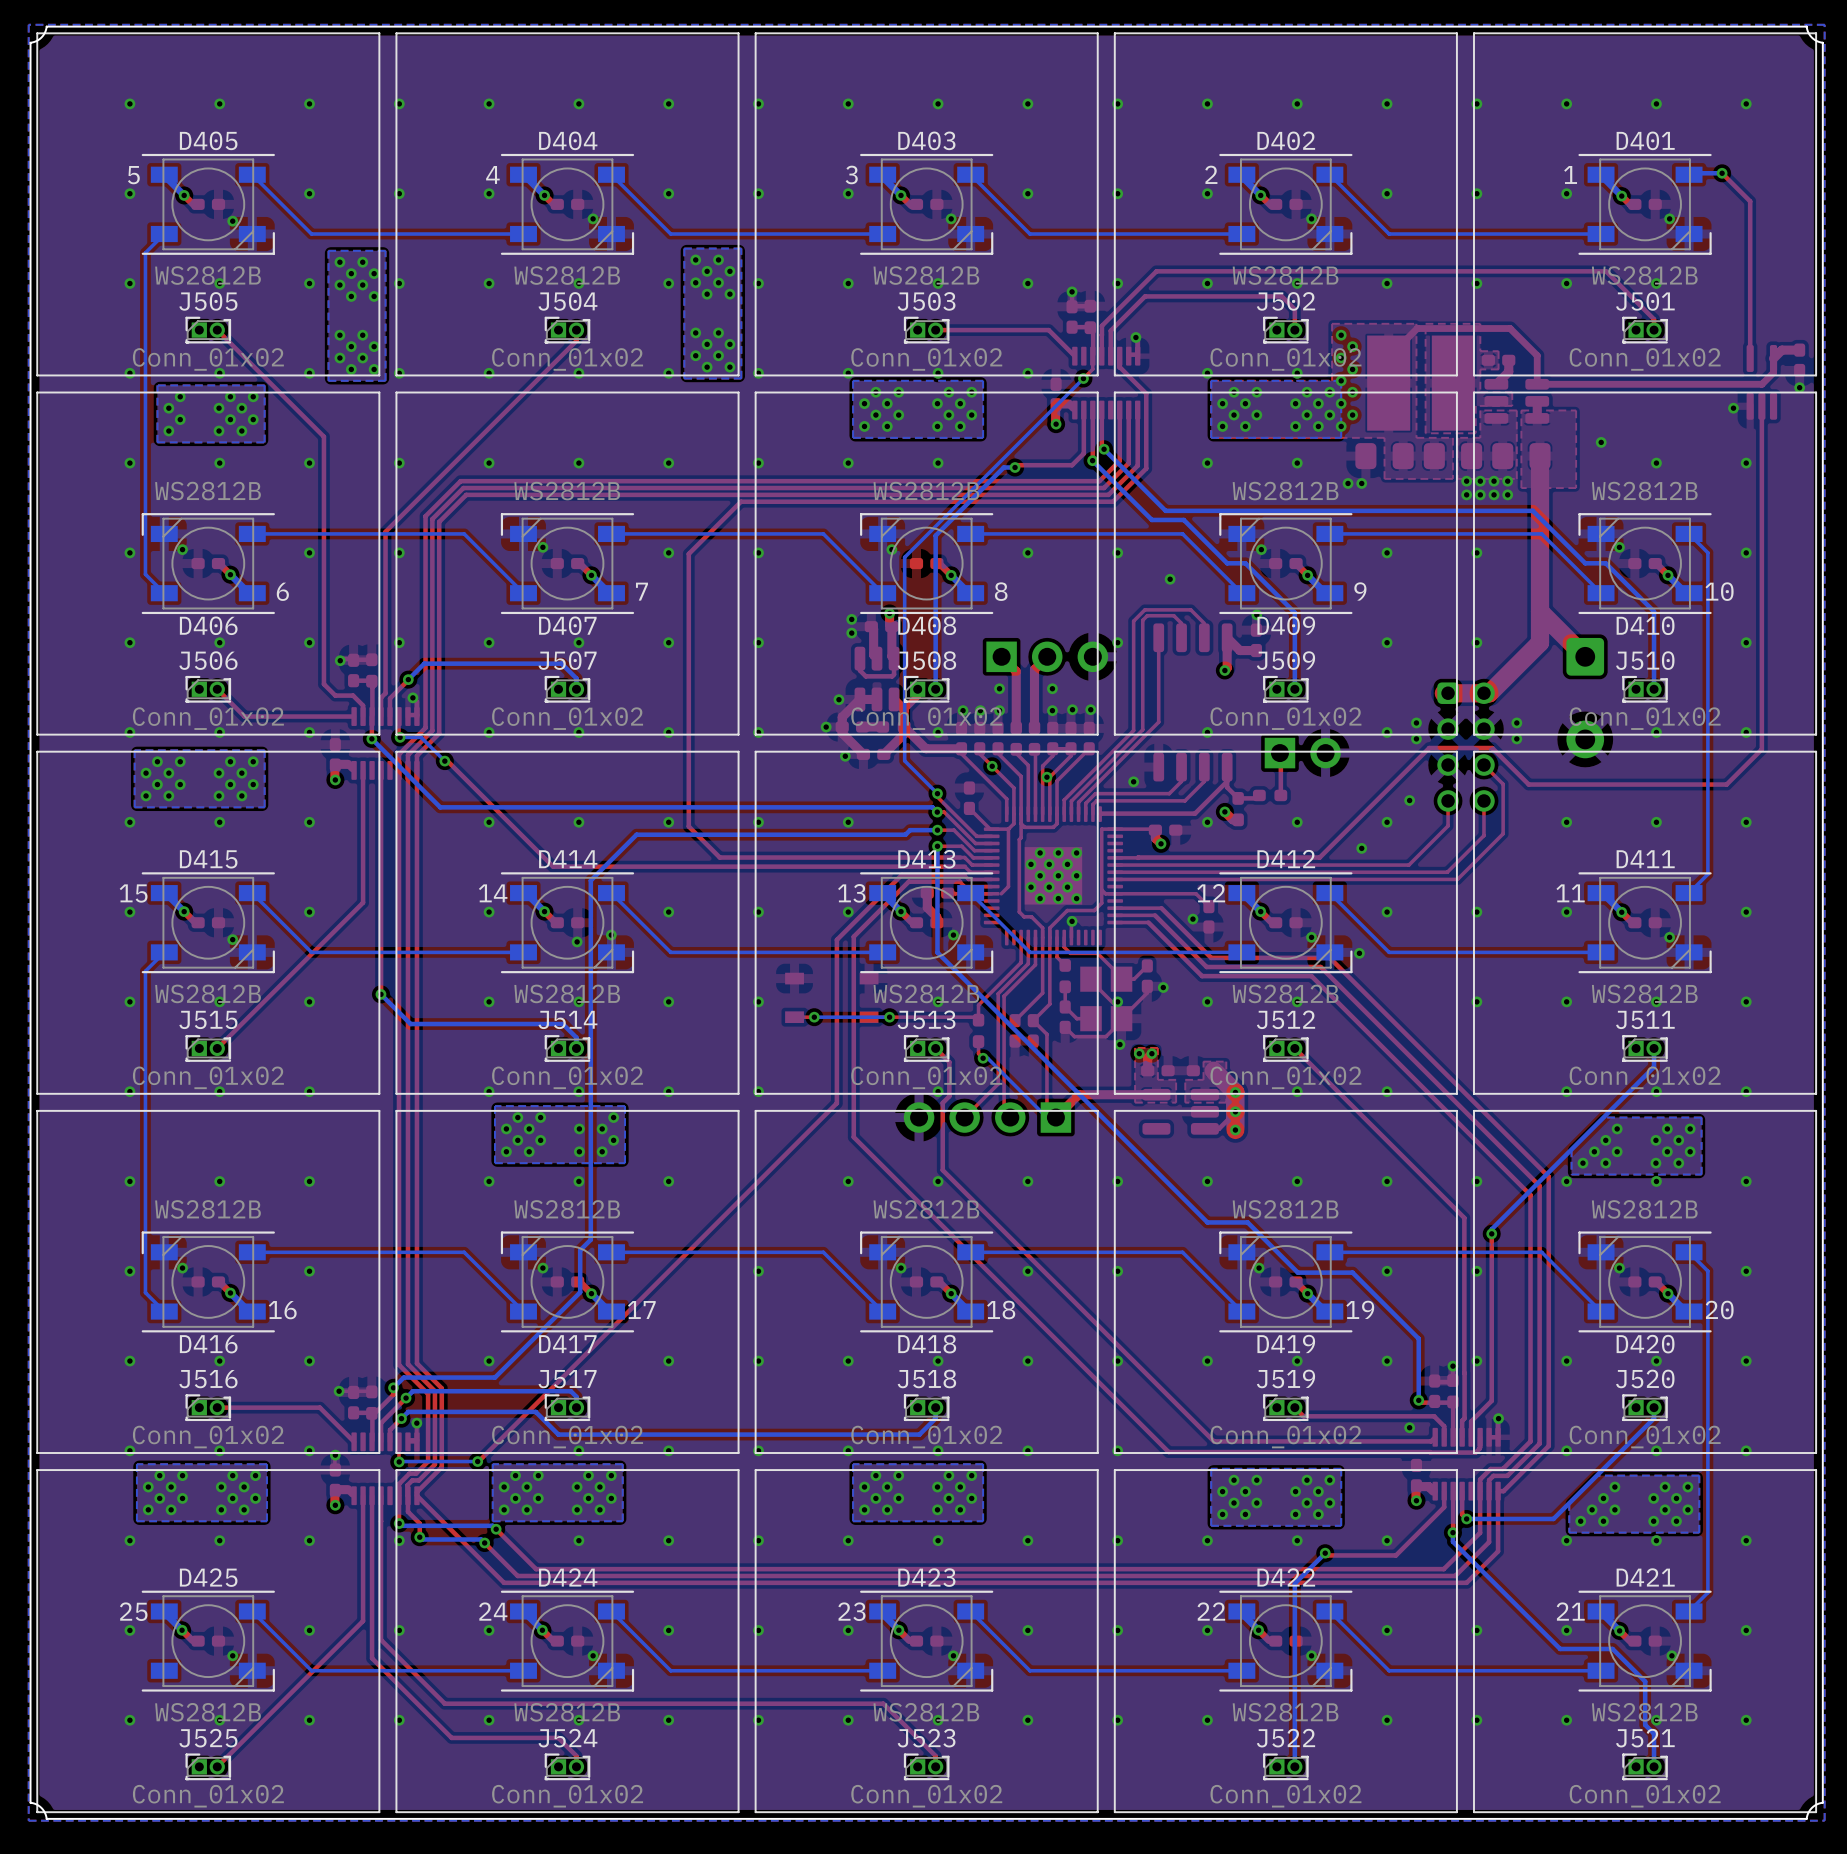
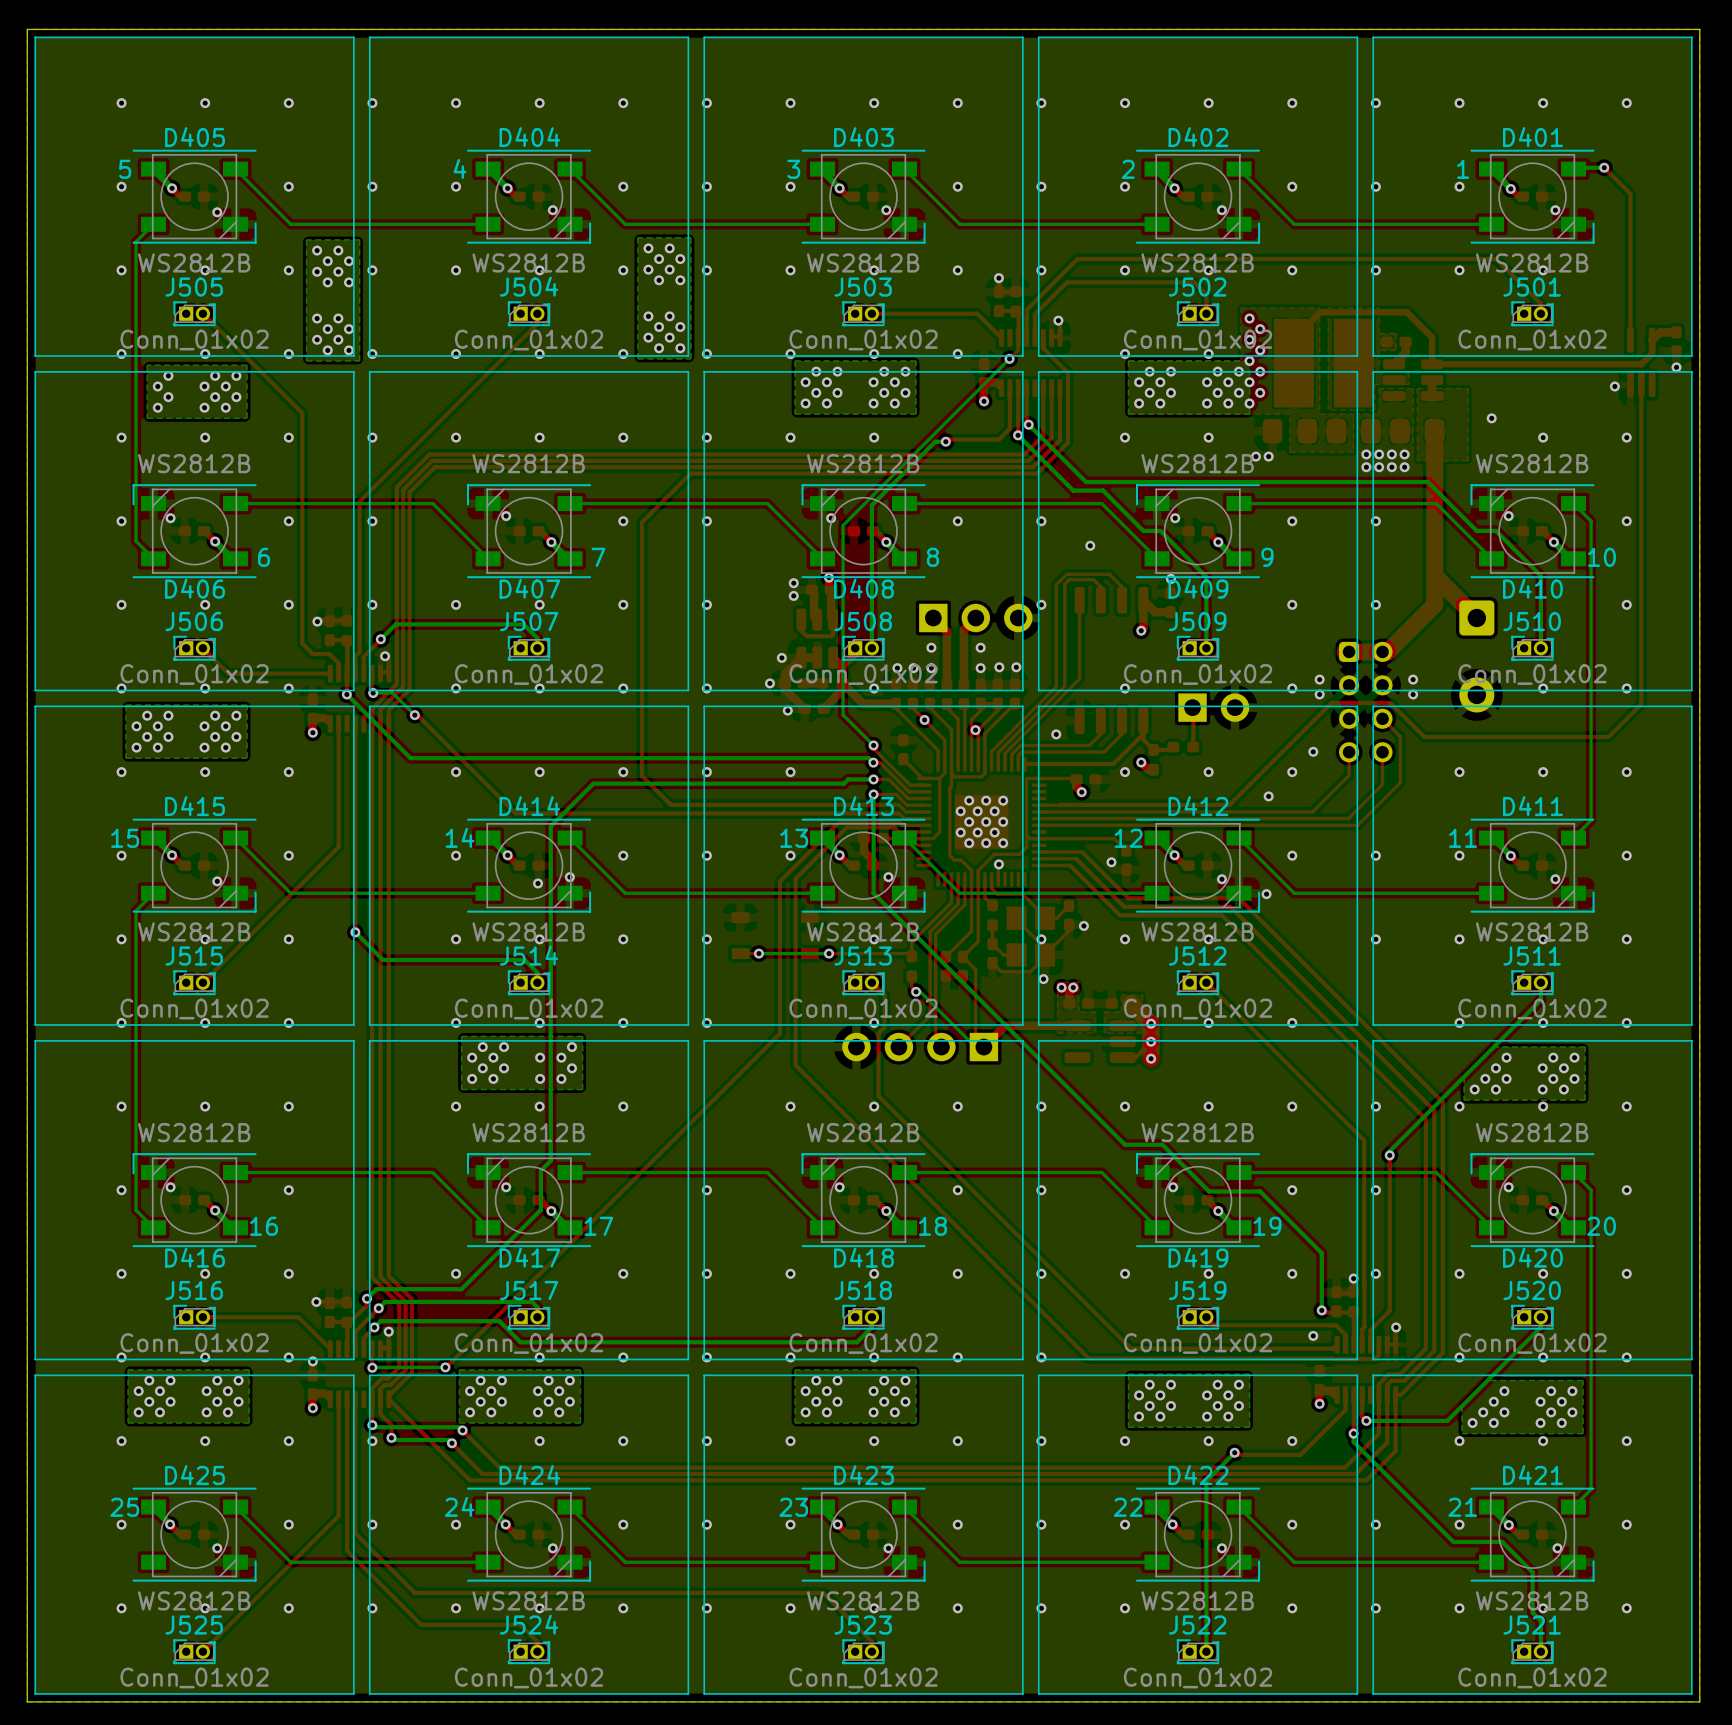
board edge: (1806, 26) (46, 26) (41, 37) (30, 42) (30, 1802) (41, 1807) (46, 1818) (1806, 1818) (1811, 1807) (1822, 1802) (1822, 42) (1811, 37) (1806, 26) -> (1699, 29) (1699, 1701) (27, 1701) (27, 29) (1699, 29)

